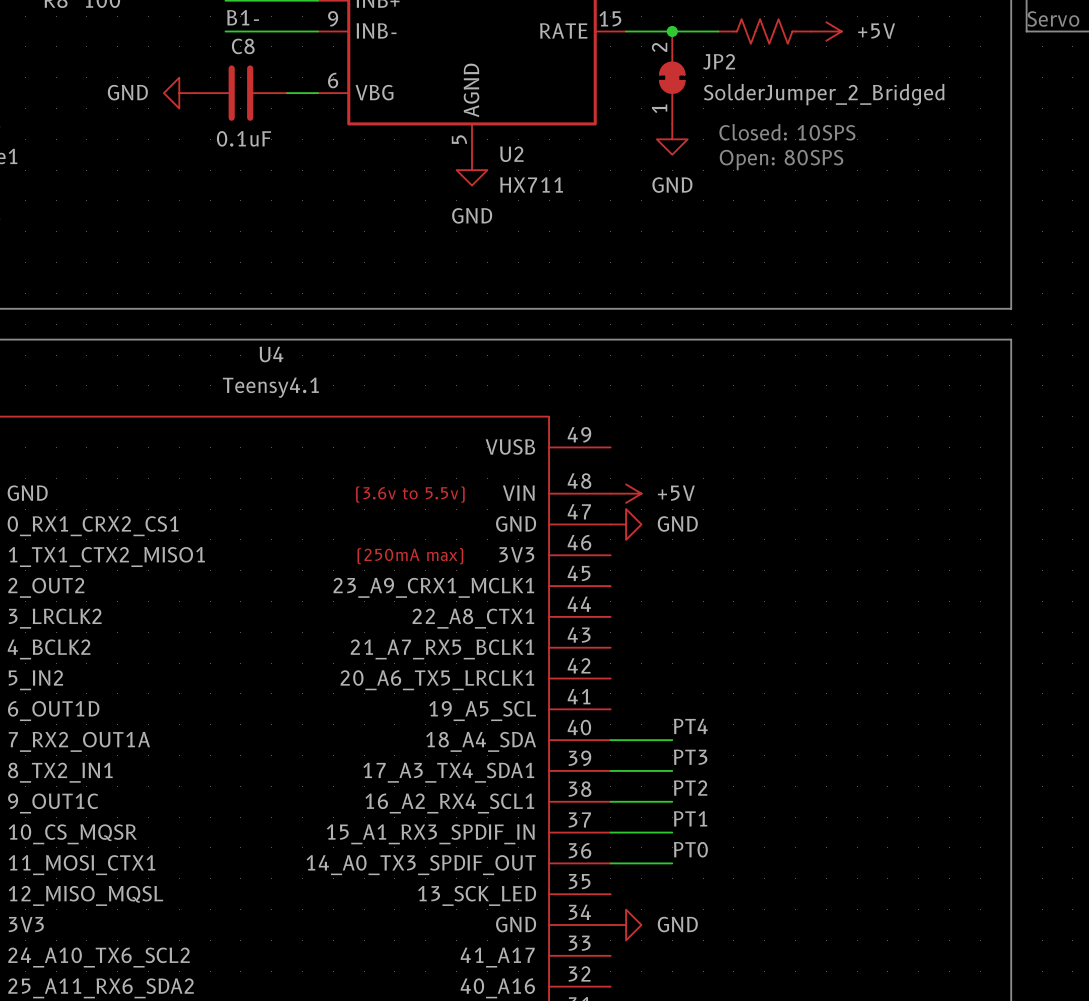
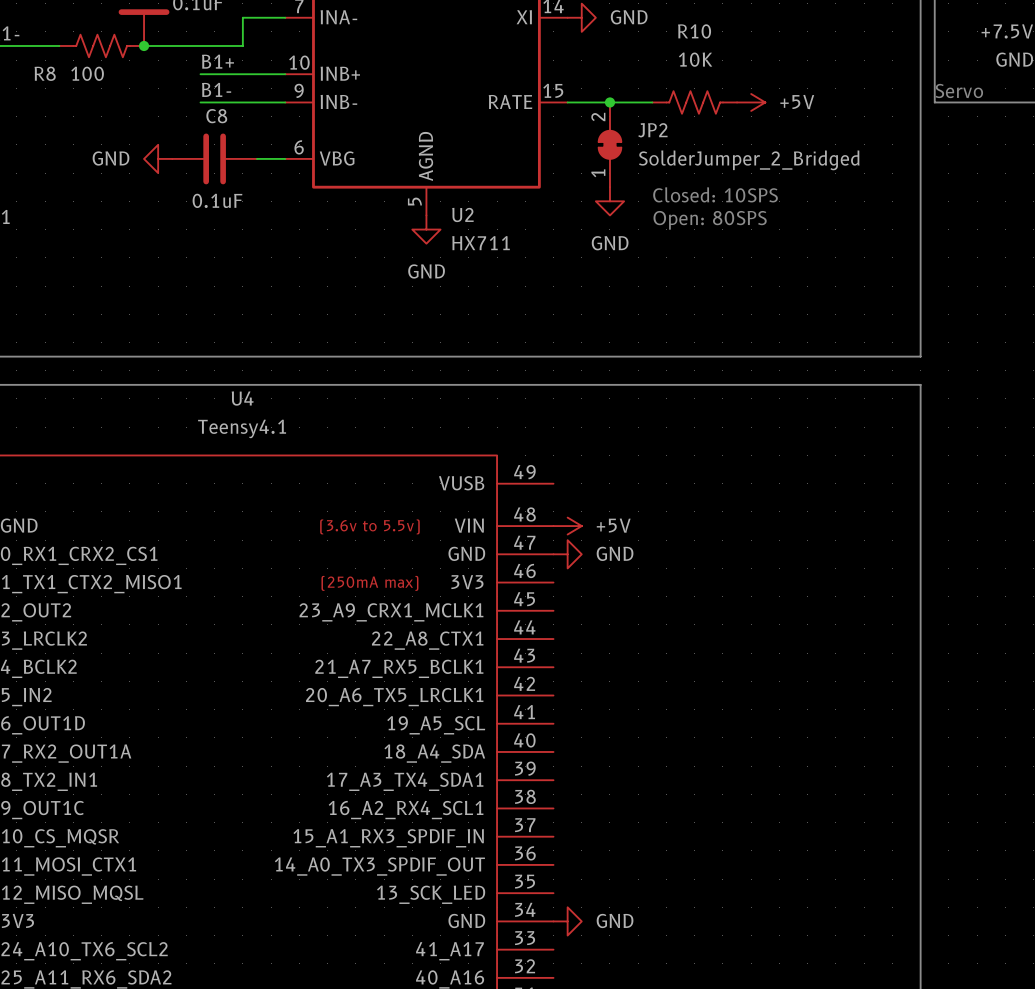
label: PT4 (690, 726) -> none
wire: (610, 740) (672, 740) -> none
label: PT3 (690, 757) -> none
wire: (610, 770) (672, 770) -> none
label: PT2 (690, 788) -> none
wire: (610, 801) (672, 801) -> none
label: PT1 (690, 818) -> none
wire: (610, 832) (672, 832) -> none
label: PT0 (690, 849) -> none
wire: (610, 863) (672, 863) -> none

